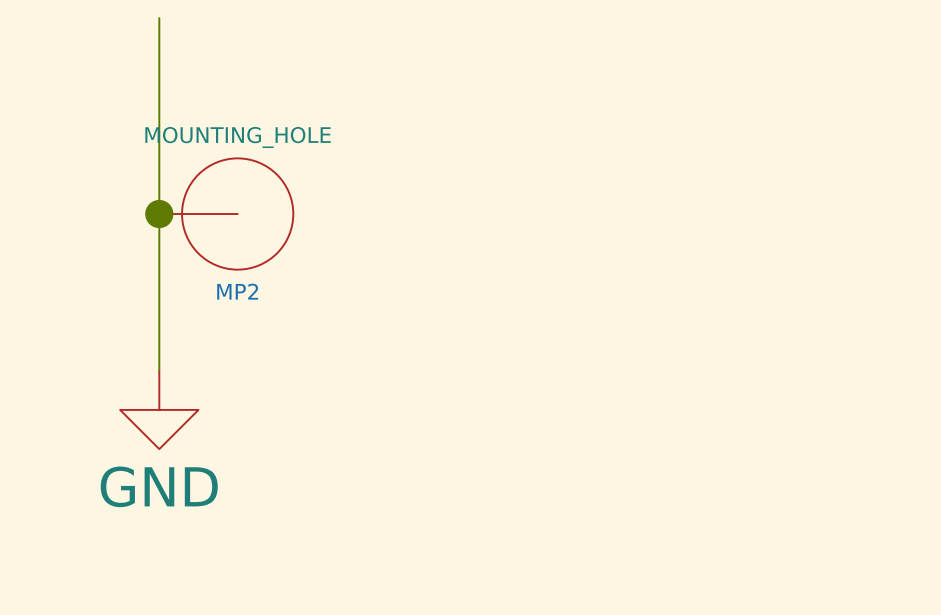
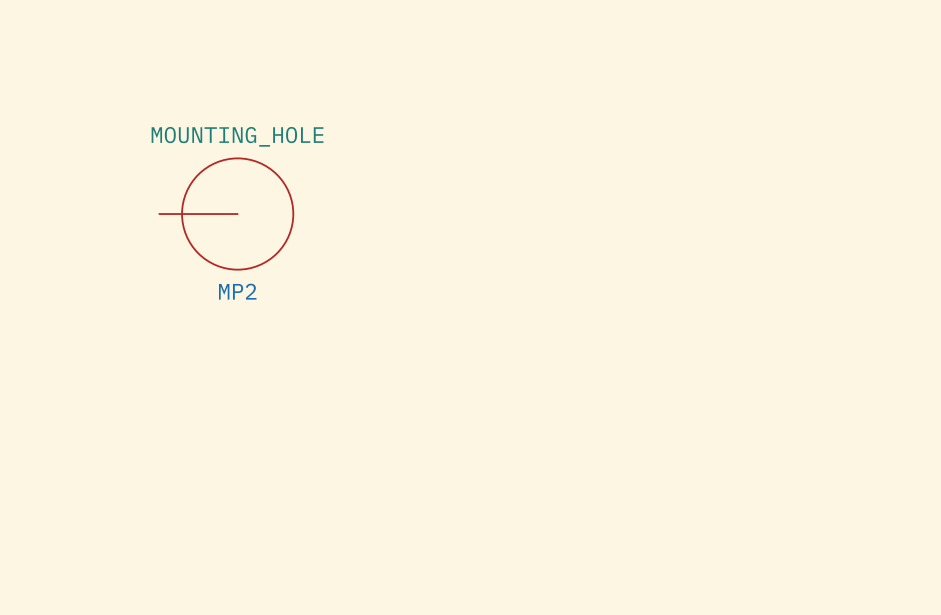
wire: (159, 18) (159, 370) -> none
junction: (159, 214) -> none
power symbol: GND (159, 409) -> none

